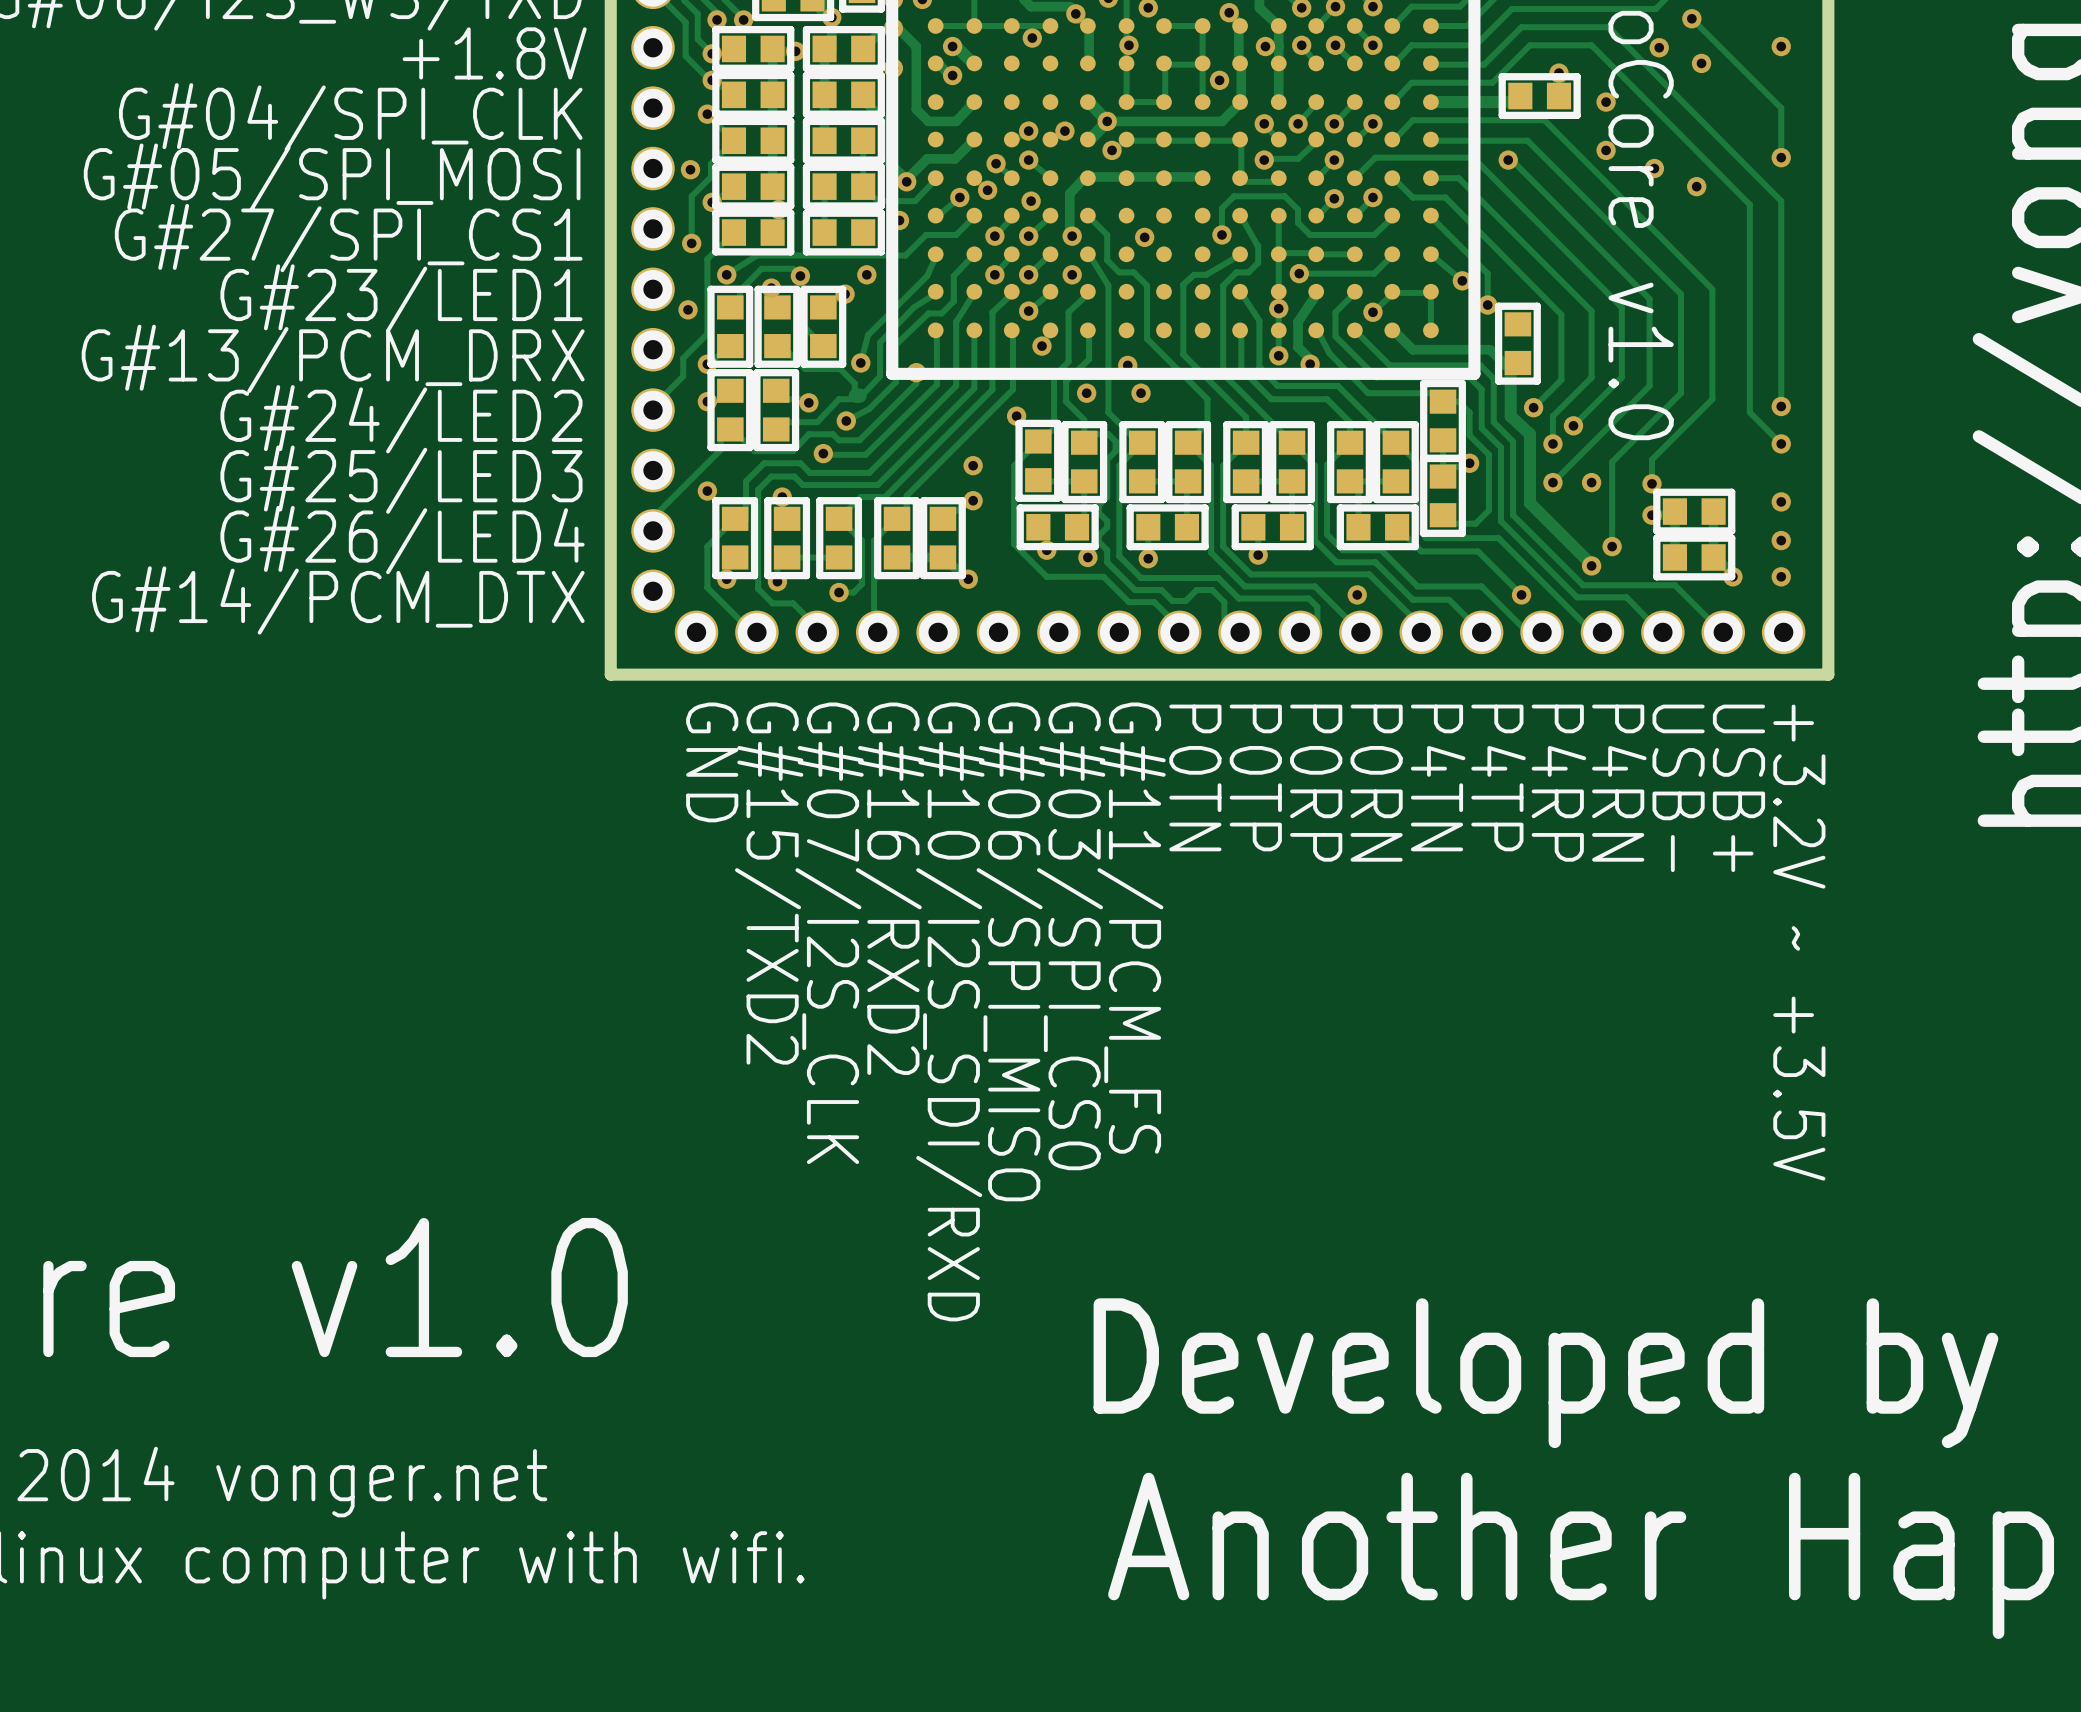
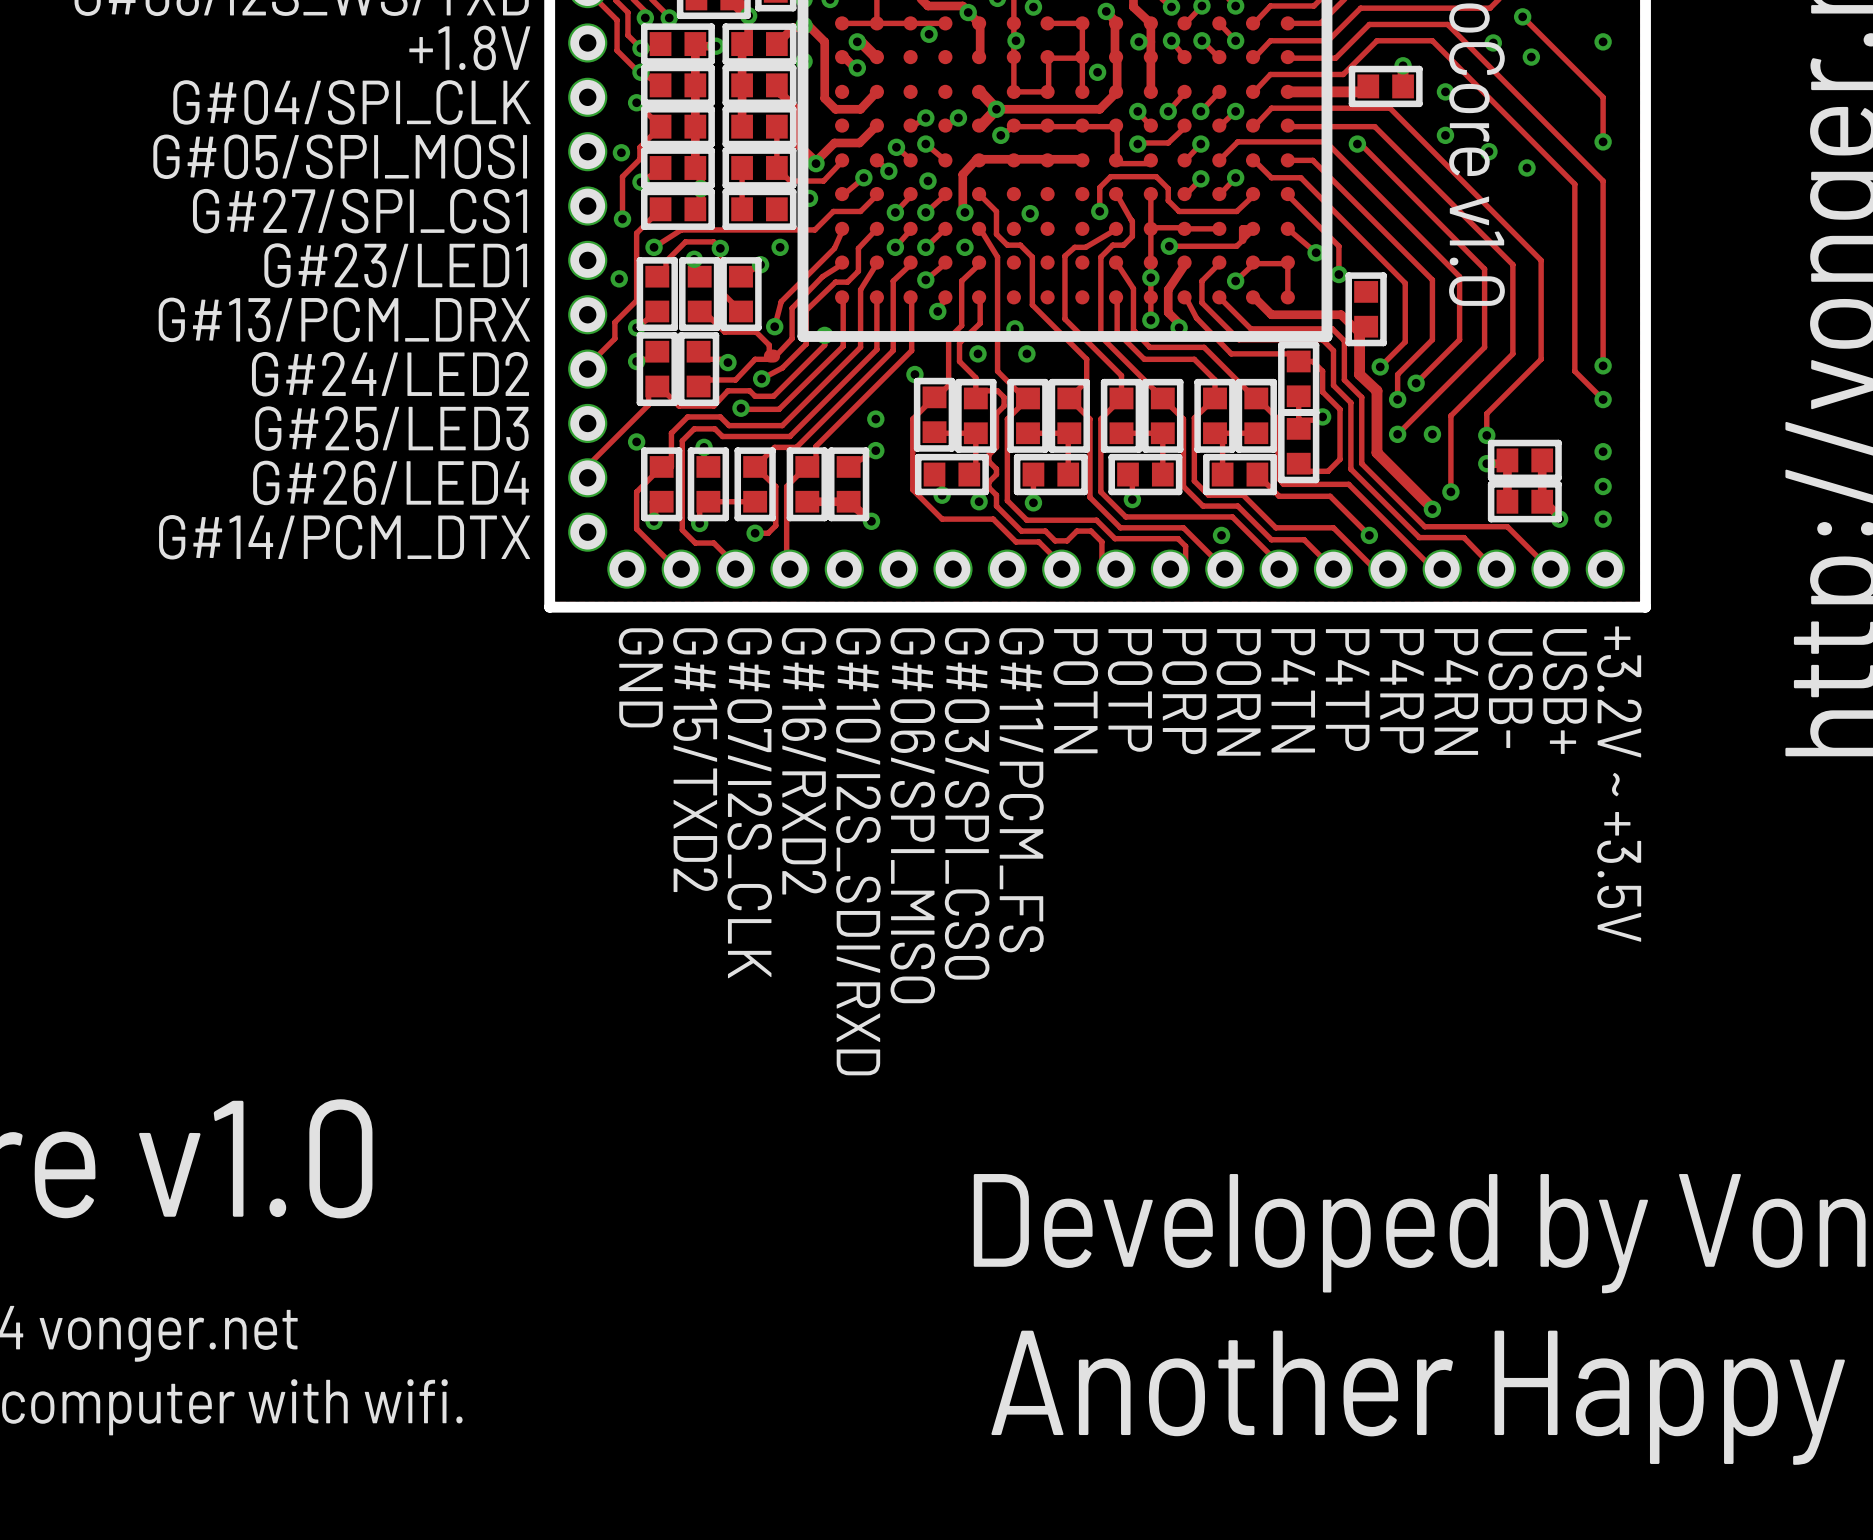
track: none -> (1253, 228) (1242, 228) (1242, 240)

